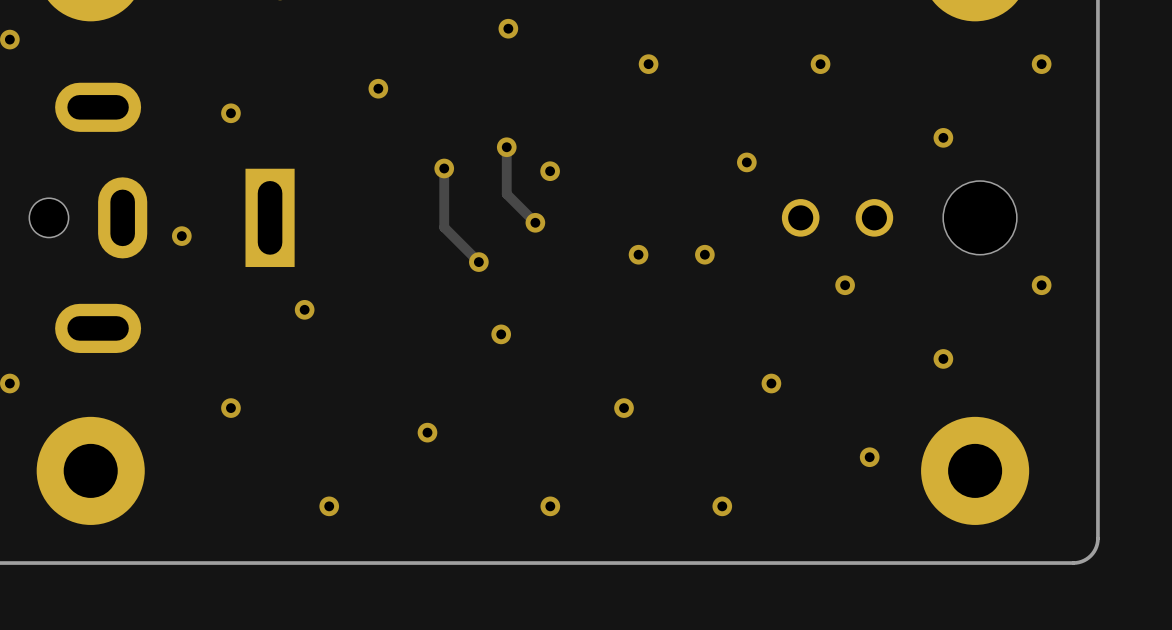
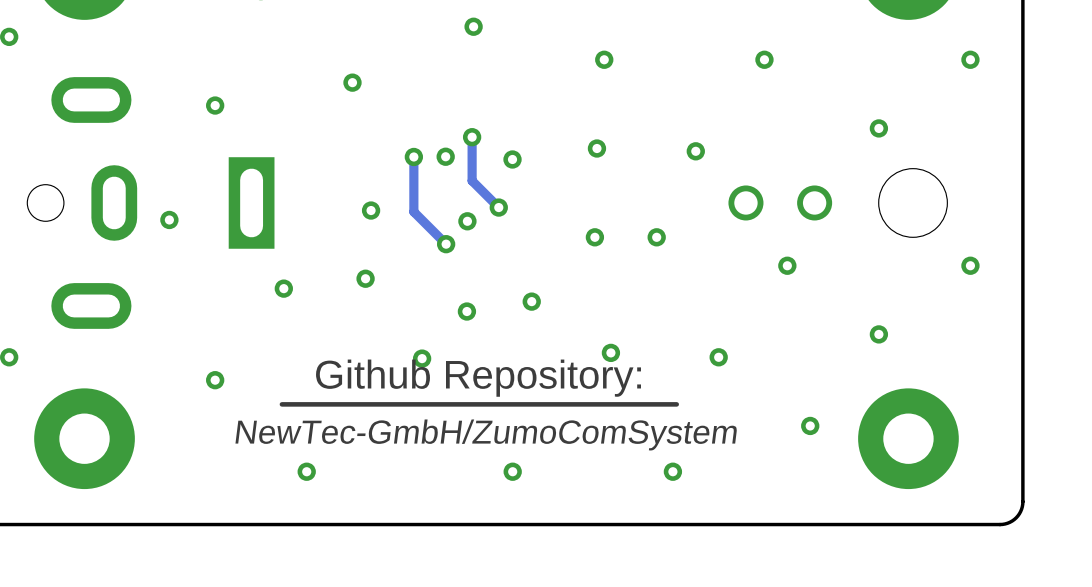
via: none -> (596, 148)
via: none -> (445, 156)
via: none -> (371, 210)
via: none -> (467, 221)
via: none -> (365, 278)
via: none -> (531, 301)
text: none -> Github Repository: (478, 378)
via position: (624, 408) -> (610, 352)
via position: (427, 432) -> (422, 358)
line: none -> (676, 404) (281, 404)
text: none -> NewTec-GmbH/ZumoComSystem (486, 434)

